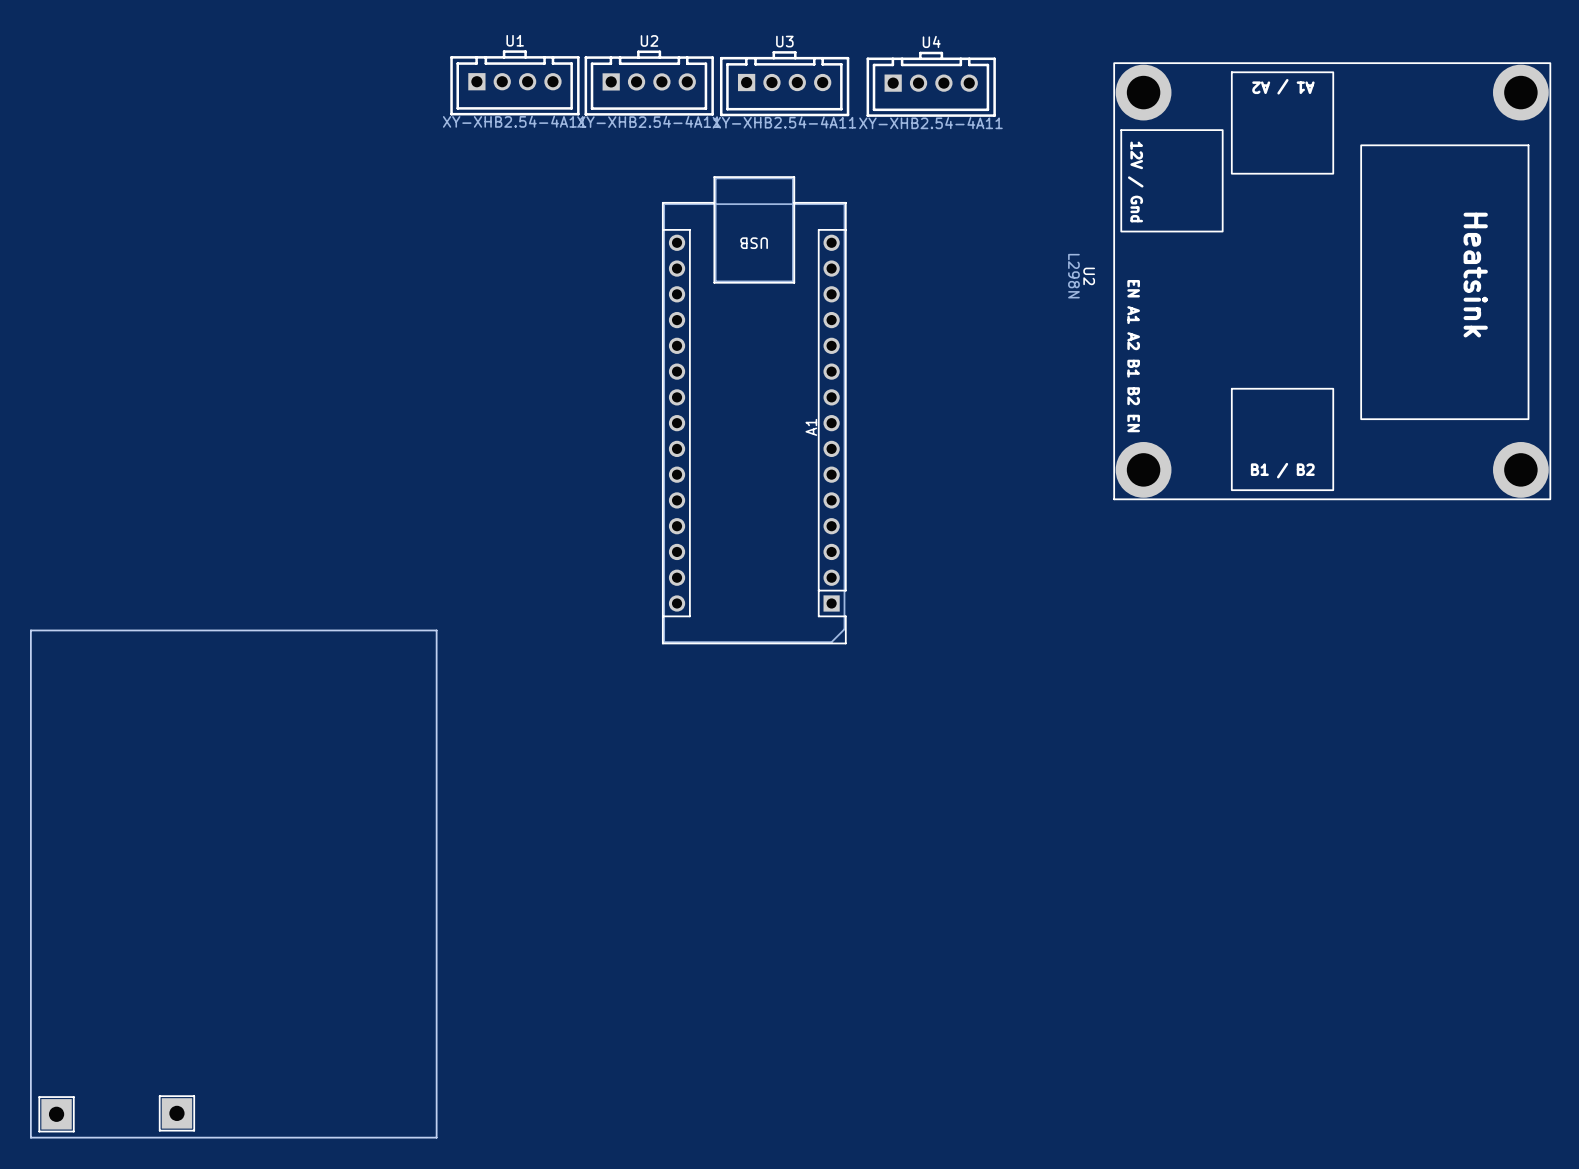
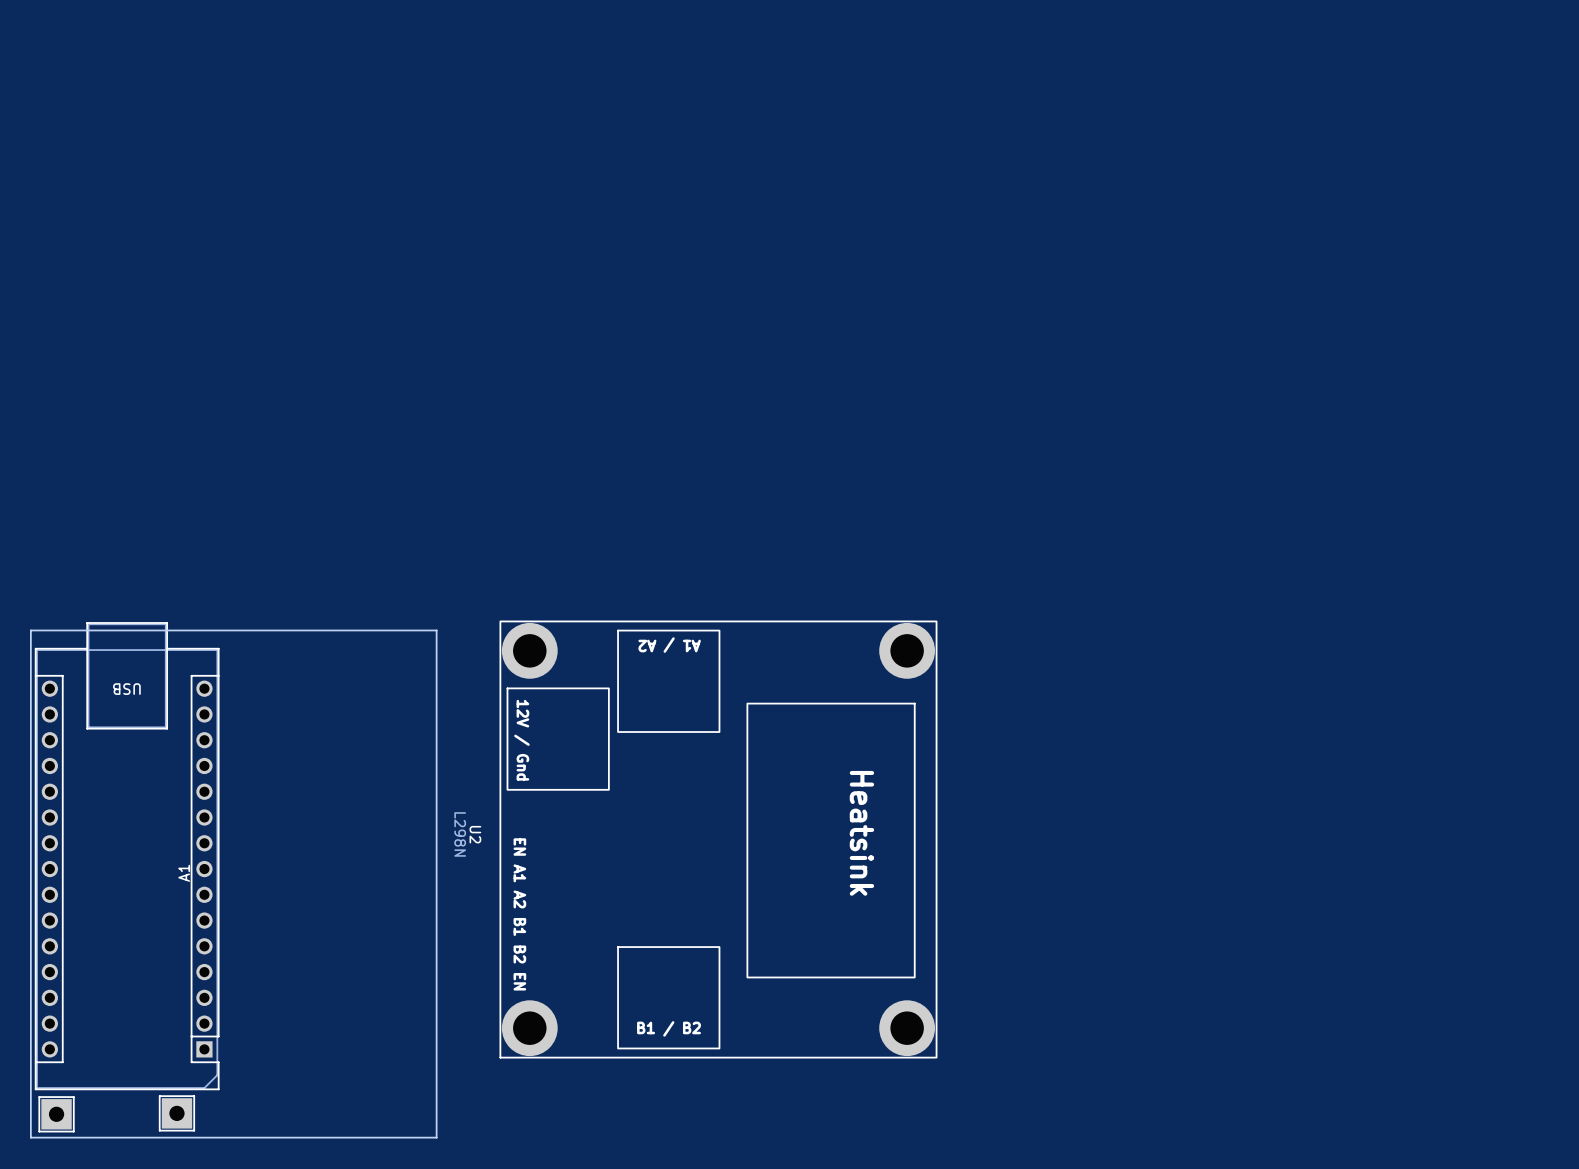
U1: XY-XHB2.54-4A11 (514, 82) -> none
U2: XY-XHB2.54-4A11 (649, 83) -> none
U3: XY-XHB2.54-4A11 (784, 83) -> none
U4: XY-XHB2.54-4A11 (931, 84) -> none
U2: L298N (1332, 281) -> none
A1 position: (754, 410) -> (127, 856)
U2: none -> L298N (718, 839)

